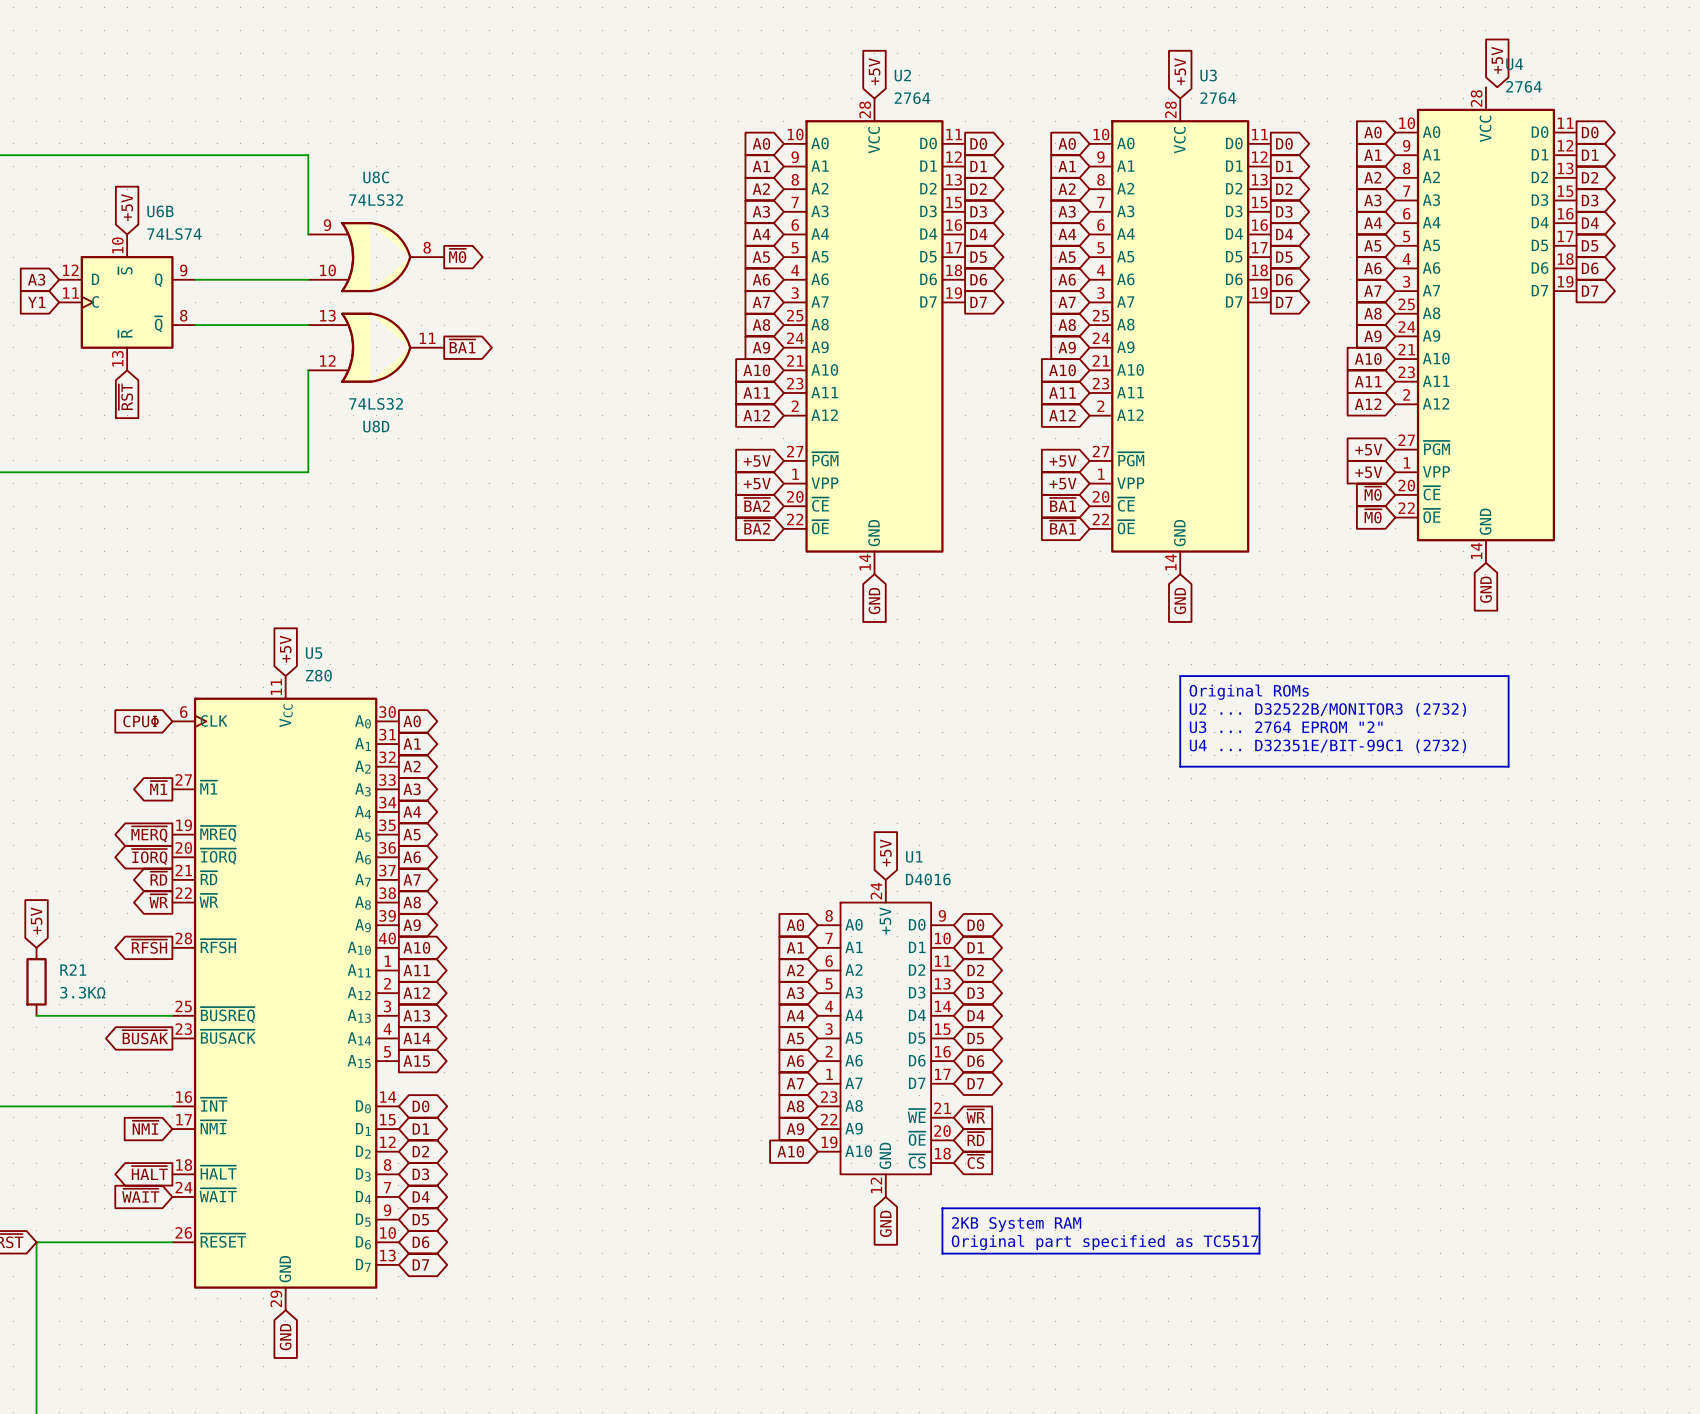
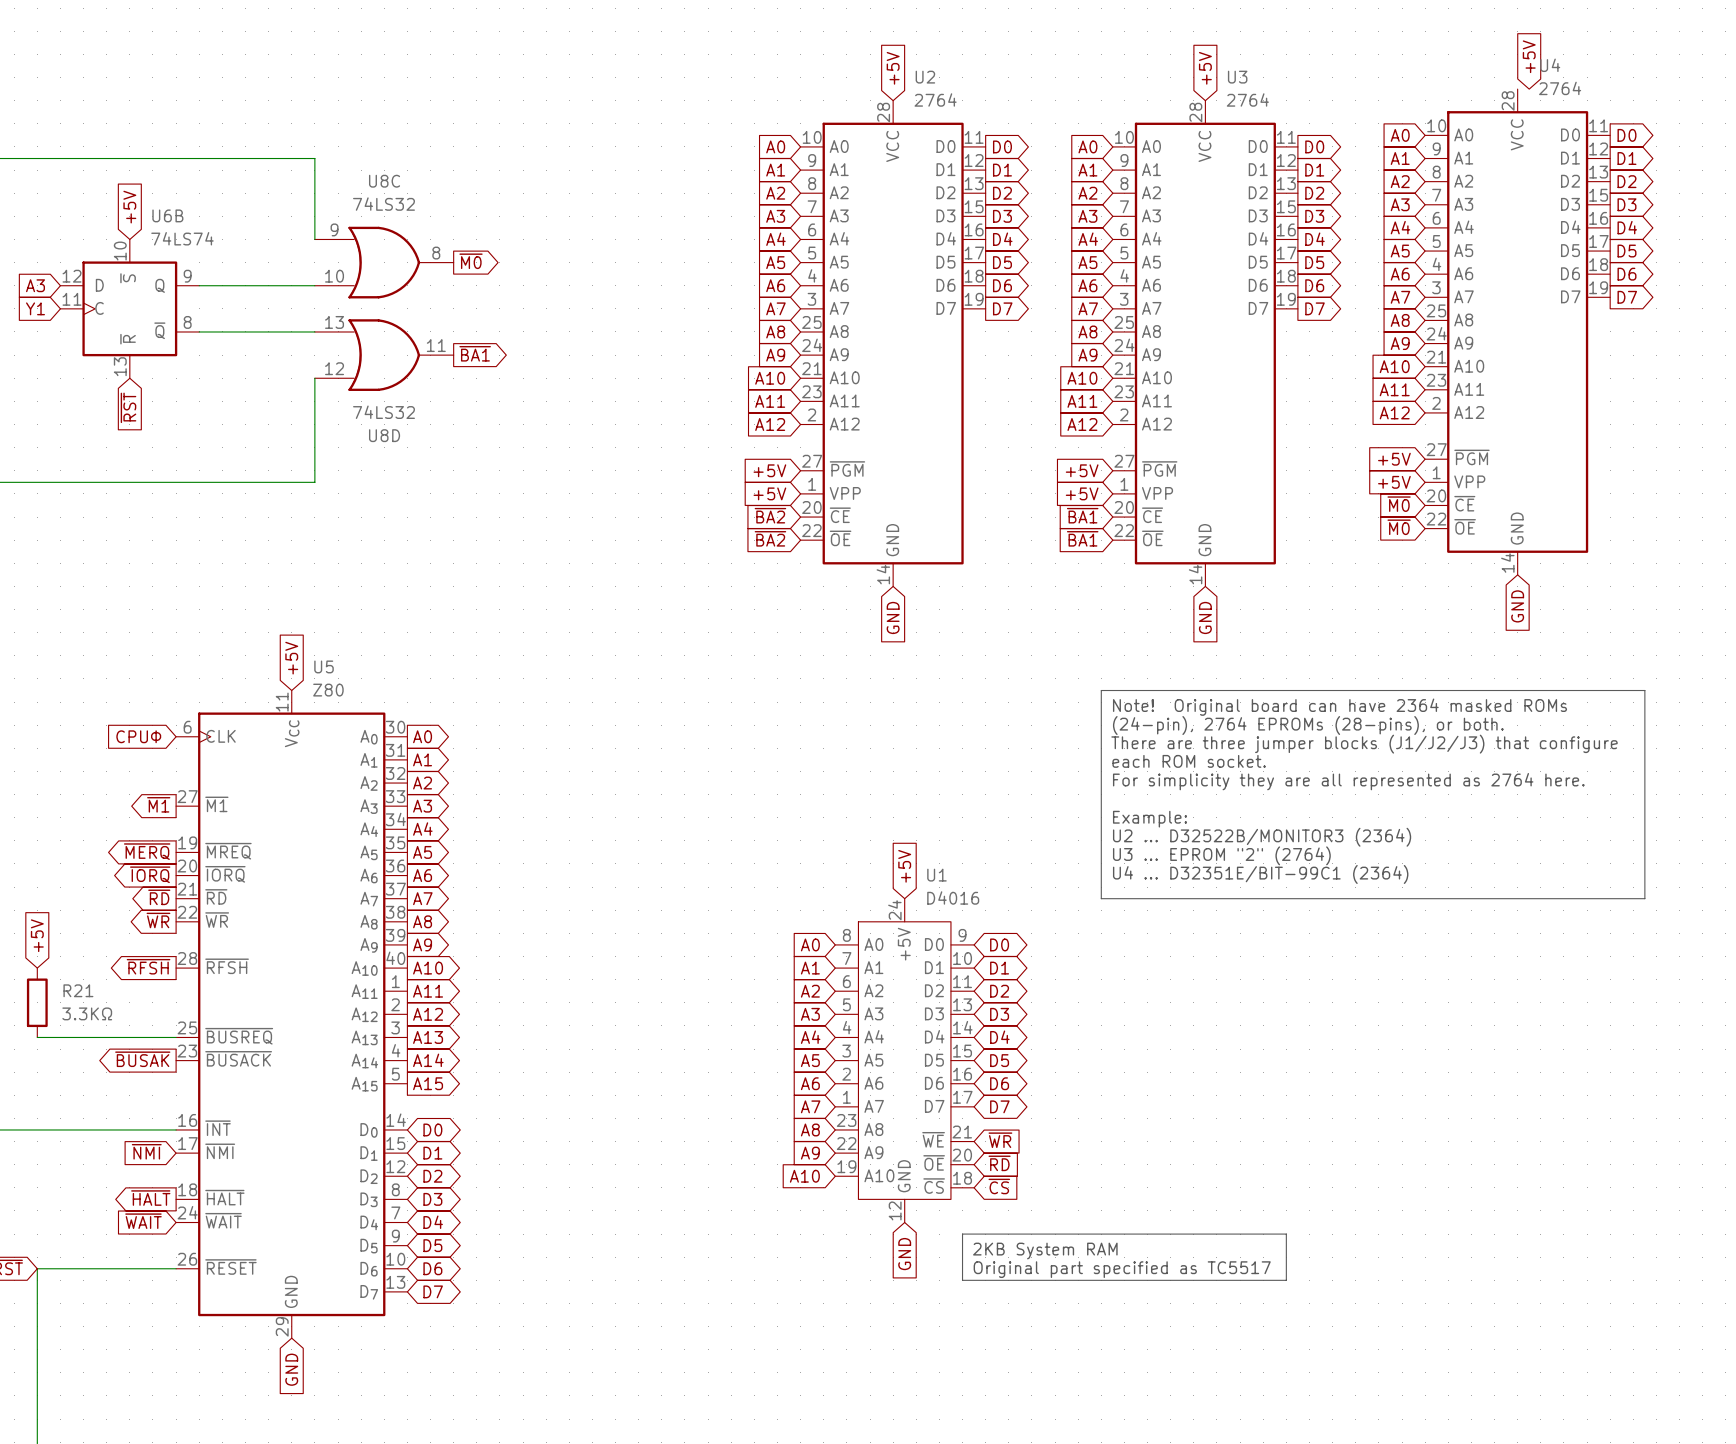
line: (1180, 676) (1180, 766) (1508, 766) (1508, 676) -> (1205, 690) (1101, 690) (1101, 898) (1644, 898) (1644, 690) (1540, 690)
text: Original ROMs (1249, 692) -> none
text: none -> Note! Original board can have 2364 masked ROMs (1339, 707)
text: U2 ... D32522B/MONITOR3 (2732) (1327, 709) -> none
text: none -> (24-pin), 2764 EPROMs (28-pins), or both. (1308, 725)
text: U3 ... 2764 EPROM "2" (1286, 727) -> none
text: none -> There are three jumper blocks (J1/J2/J3) that configure (1364, 744)
text: none -> each ROM socket. (1189, 761)
text: U4 ... D32351E/BIT-99C1 (2732) (1327, 746) -> none
text: none -> For simplicity they are all represented as 2764 here. (1348, 781)
text: none -> Example: (1149, 819)
text: none -> U2 ... D32522B/MONITOR3 (2364) (1262, 837)
text: none -> U3 ... EPROM "2" (2764) (1221, 855)
text: none -> U4 ... D32351E/BIT-99C1 (2364) (1260, 874)

